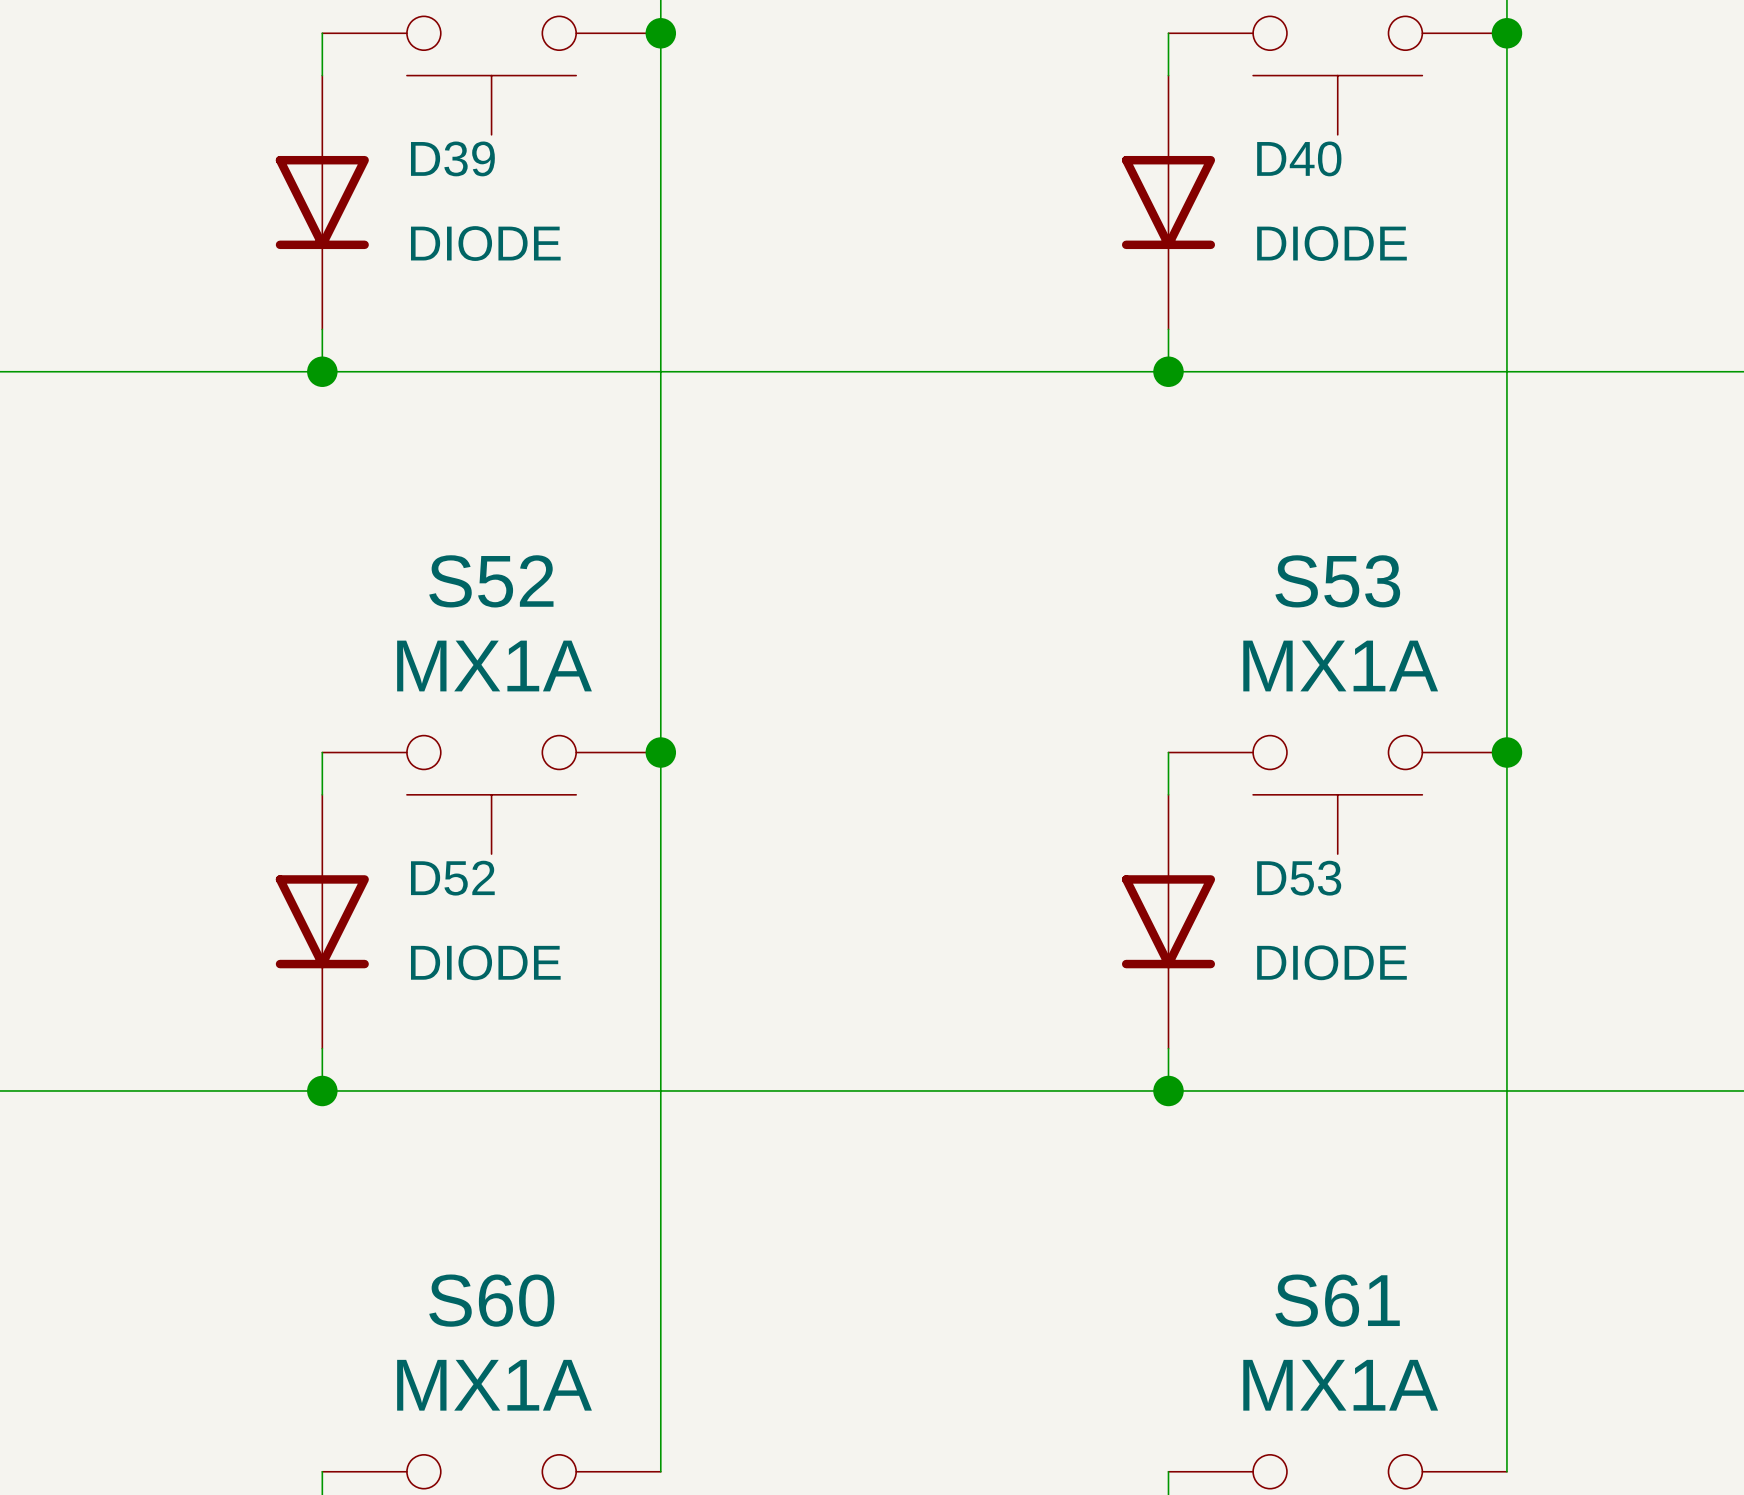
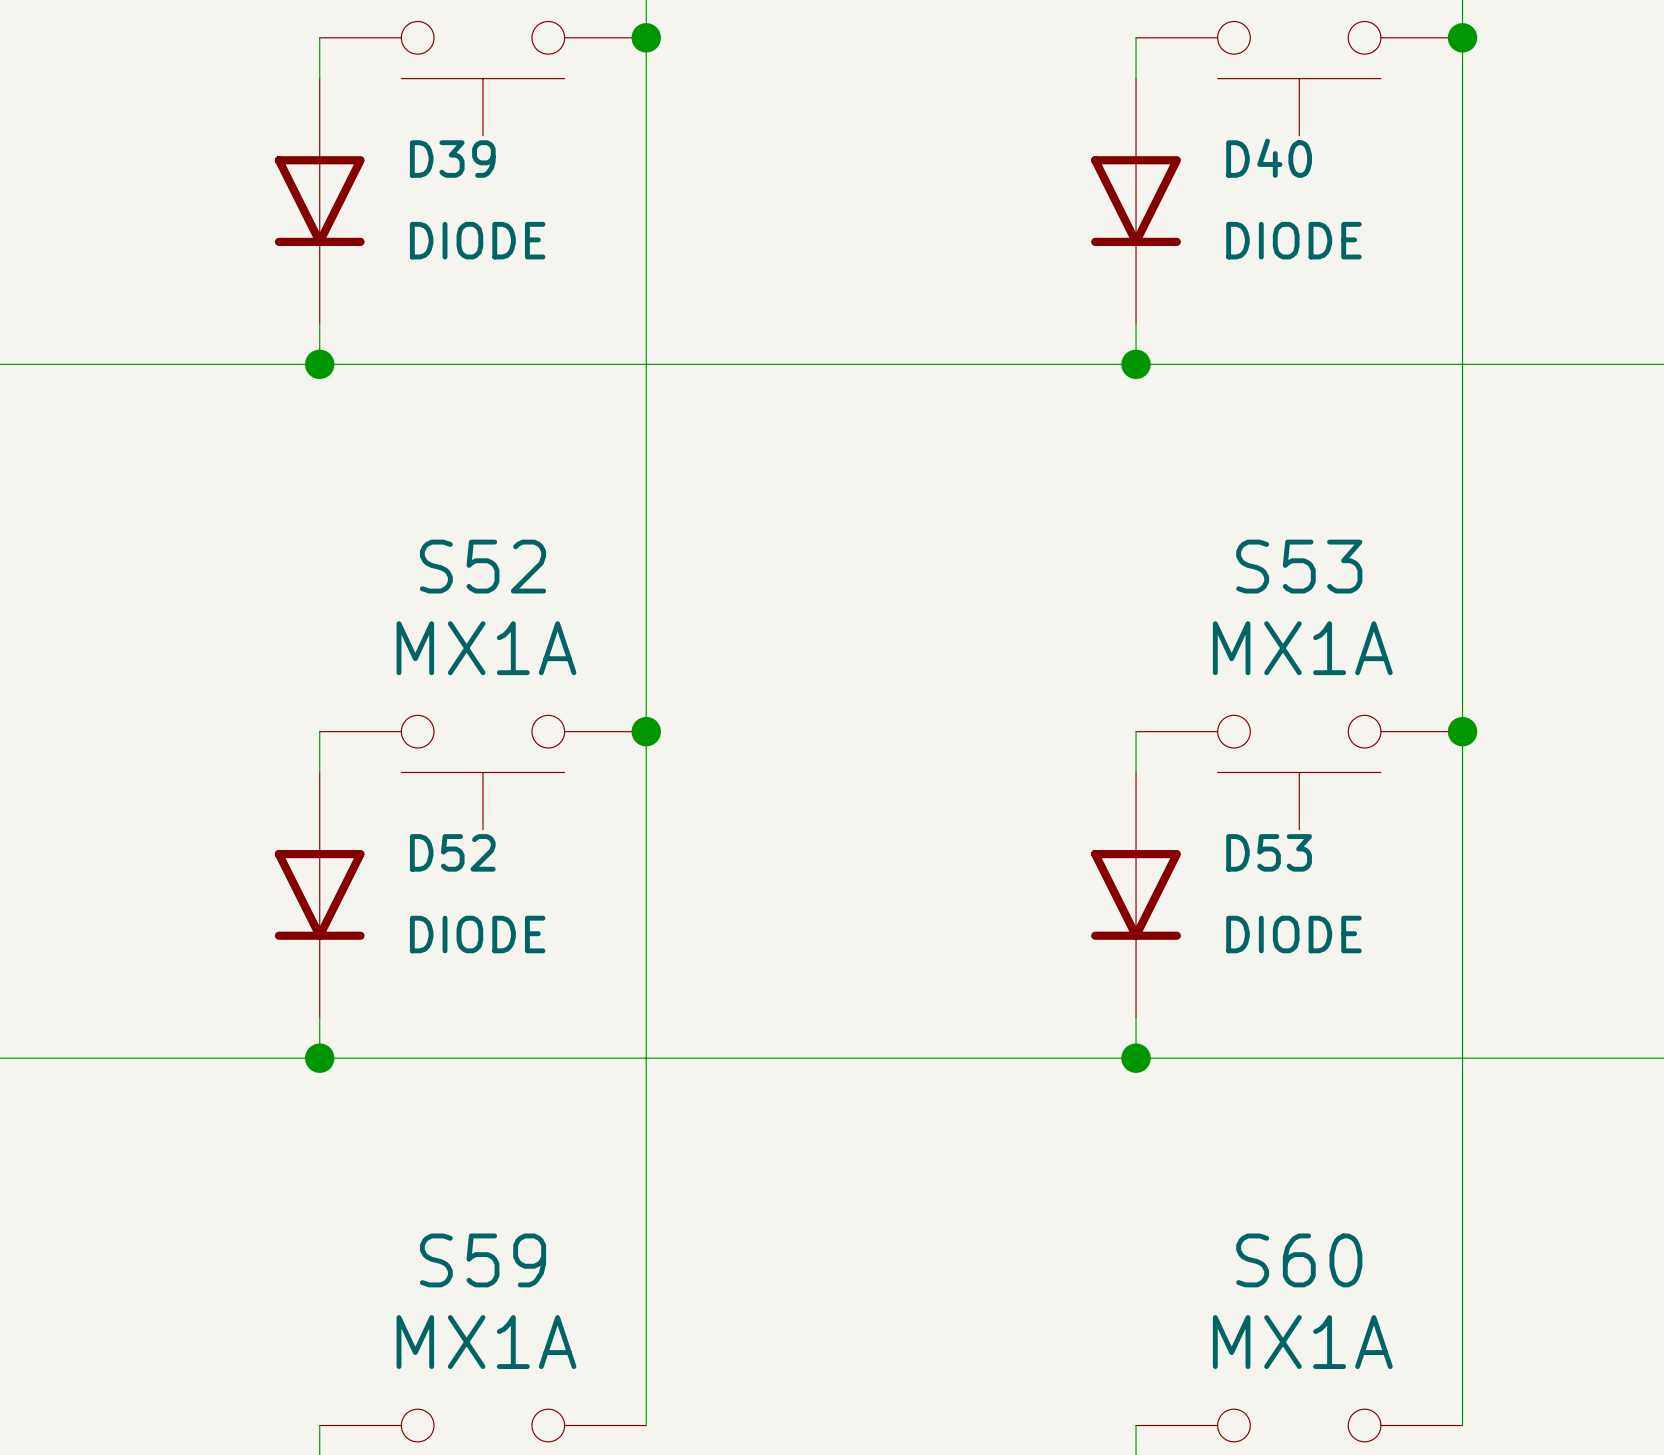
S60 name: S60 (491, 1300) -> S59 (482, 1260)
S61 name: S61 (1337, 1300) -> S60 (1299, 1260)

